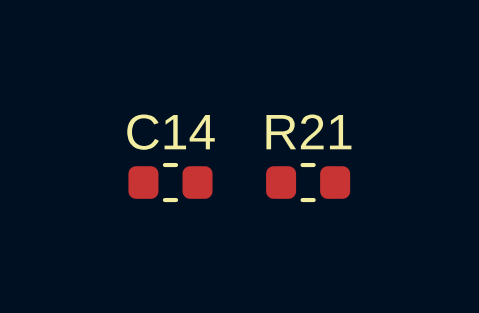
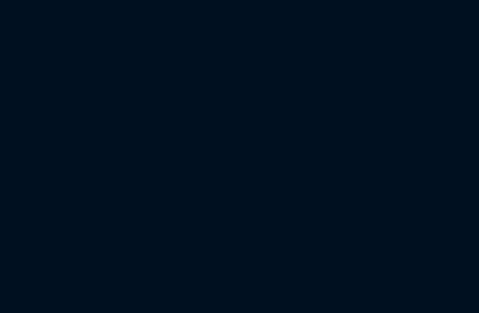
C14: (170, 182) -> none
R21: (308, 182) -> none

